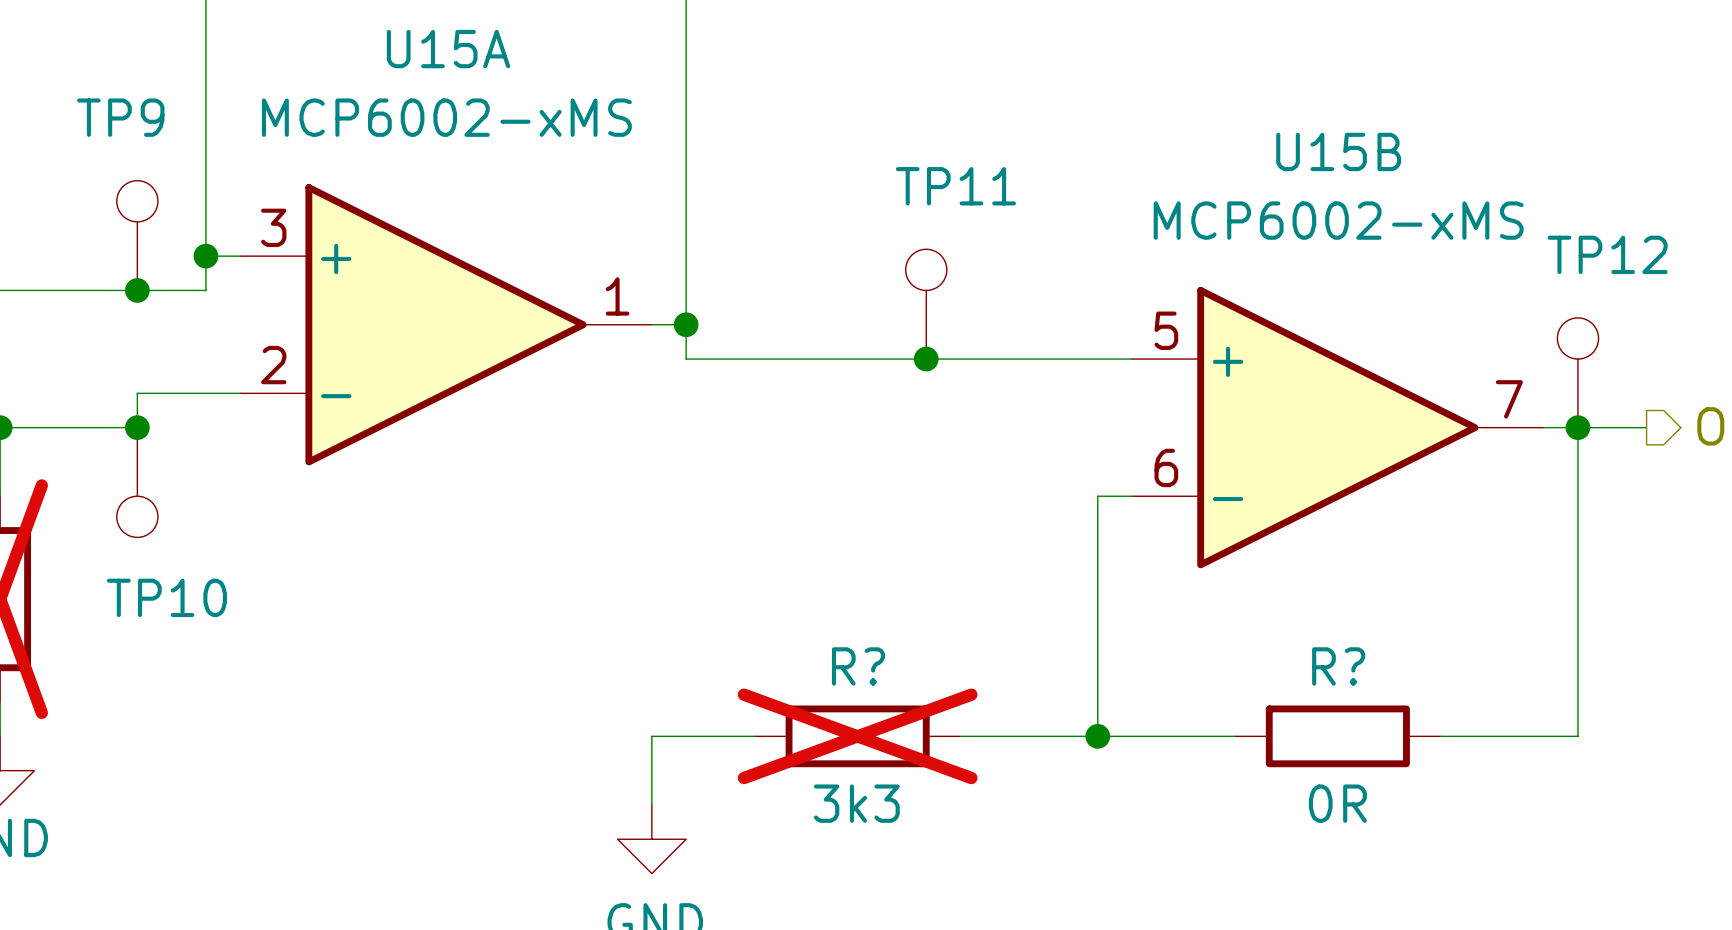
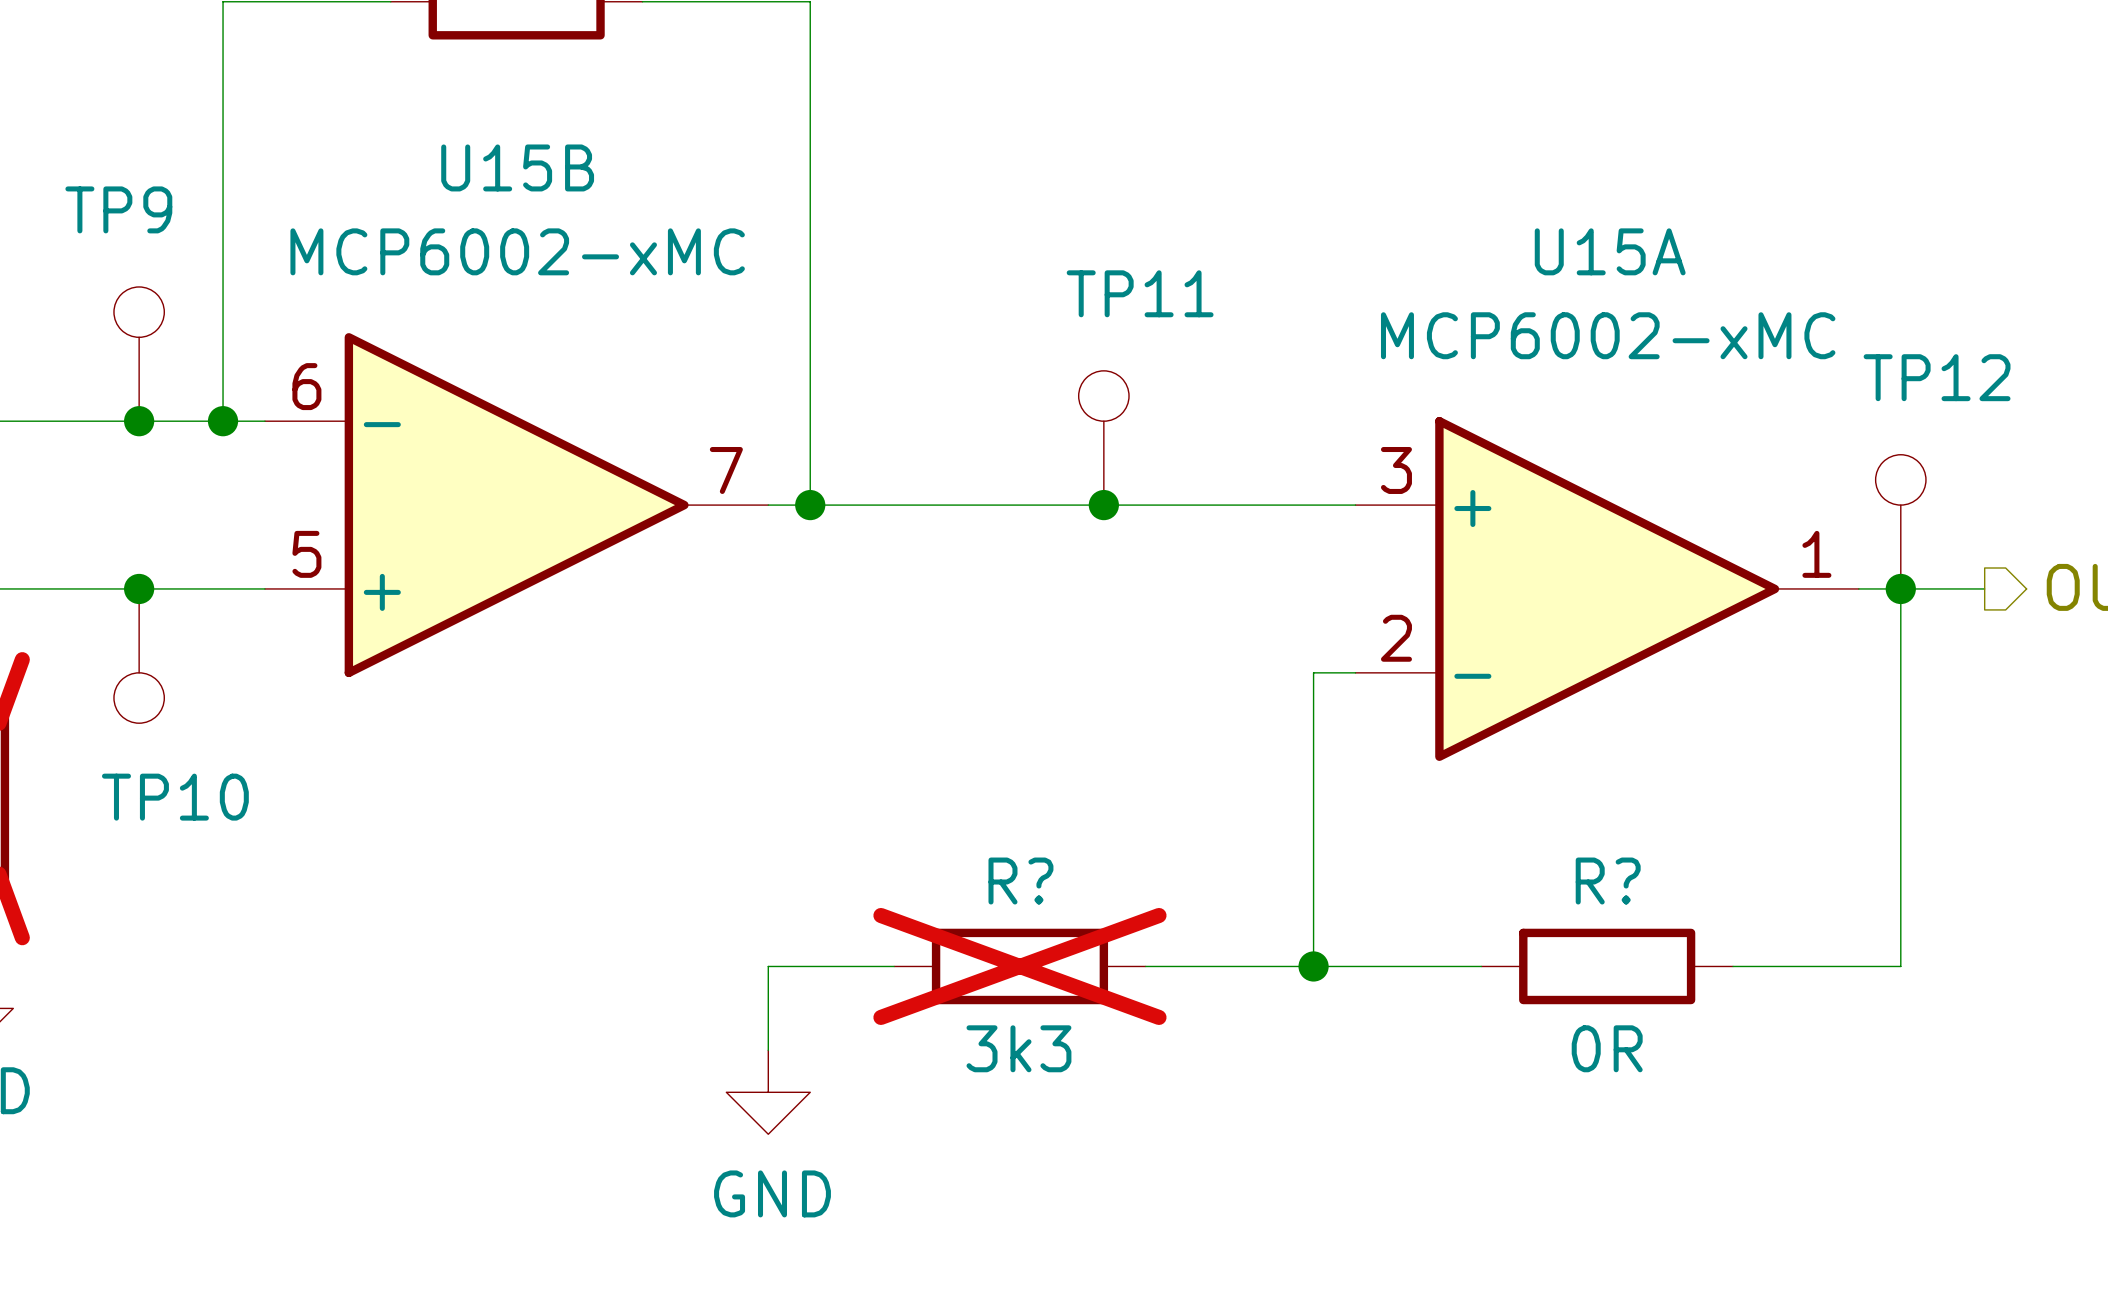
U15A value: MCP6002-xMS (446, 117) -> MCP6002-xMC (1608, 335)
U15B value: MCP6002-xMS (1338, 220) -> MCP6002-xMC (517, 251)
wire: (205, 256) (240, 256) -> (223, 421) (264, 421)
junction position: (205, 256) -> (223, 421)
U15A position: (446, 324) -> (1607, 588)
wire: (651, 324) (686, 324) -> (768, 505) (810, 505)
junction position: (686, 324) -> (810, 505)
wire: (240, 393) (137, 393) (137, 427) -> (264, 588) (139, 588)
U15B flip: as is (1337, 427) -> up-down (516, 505)
U15B position: (1337, 427) -> (516, 505)

